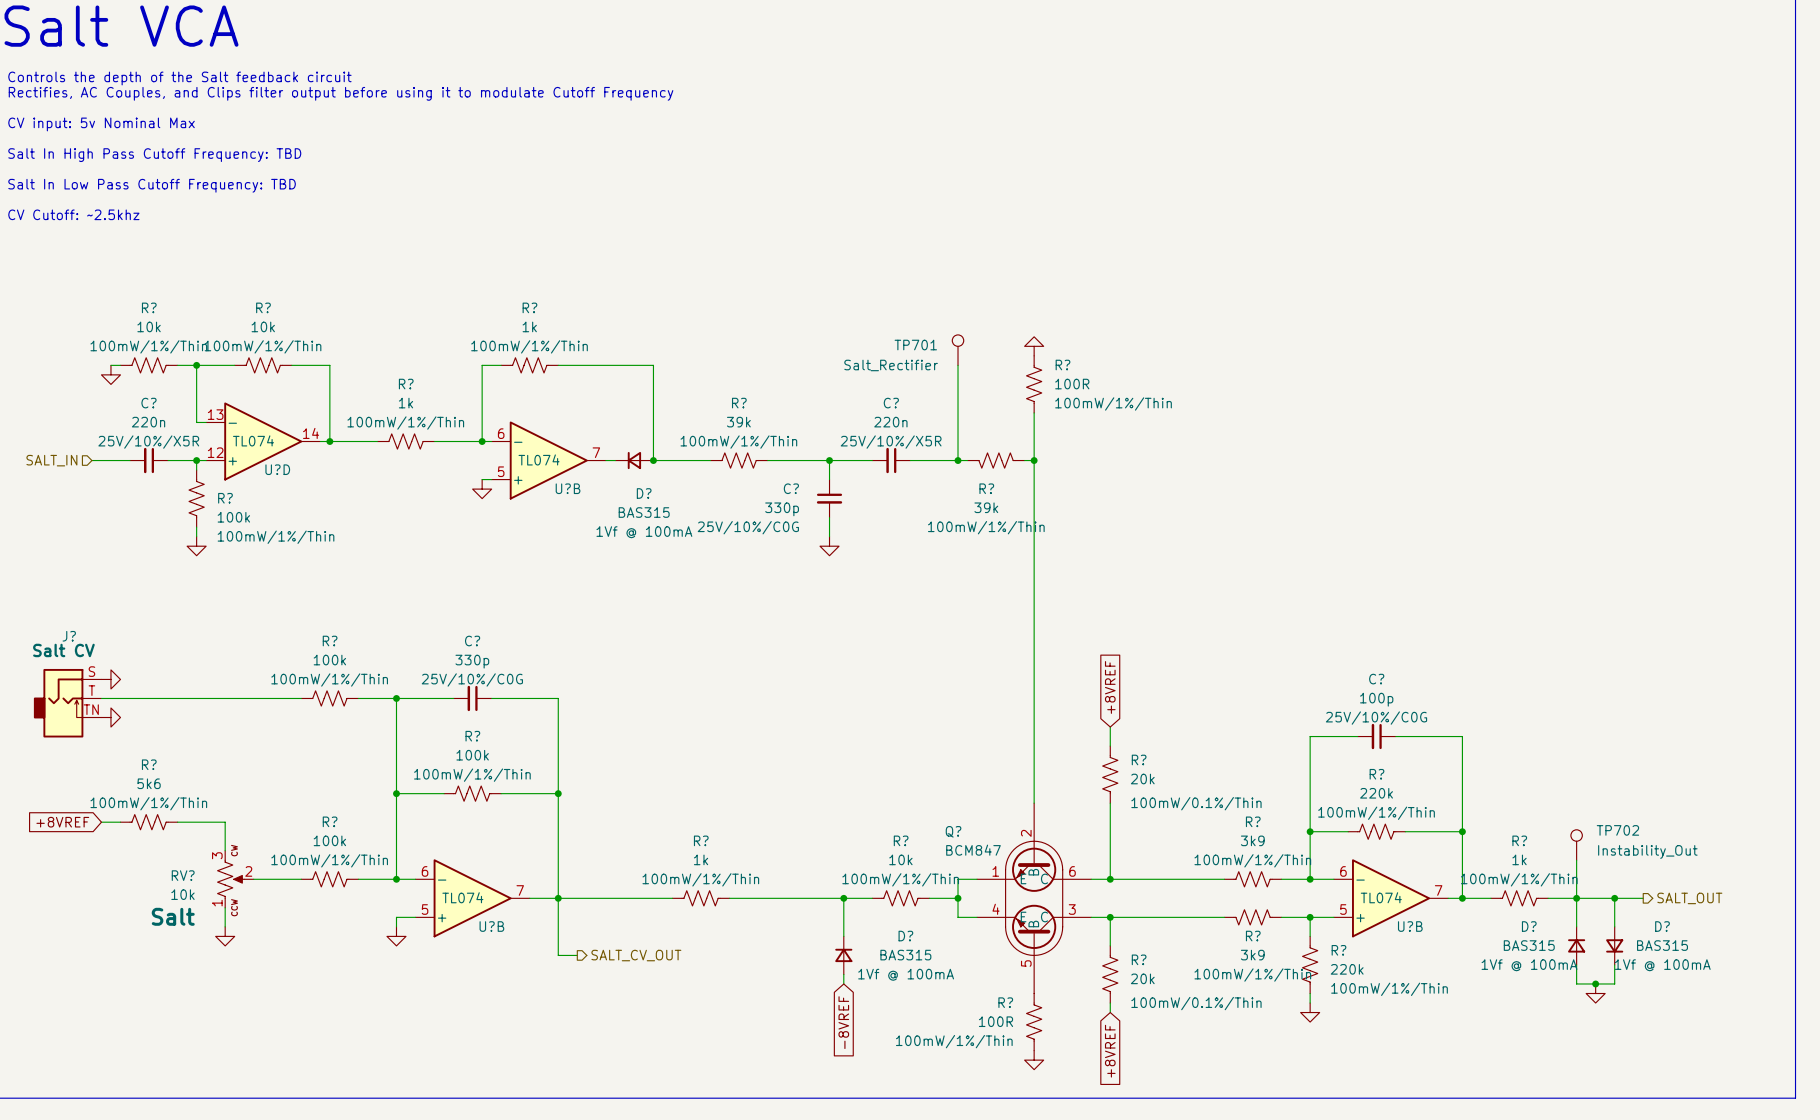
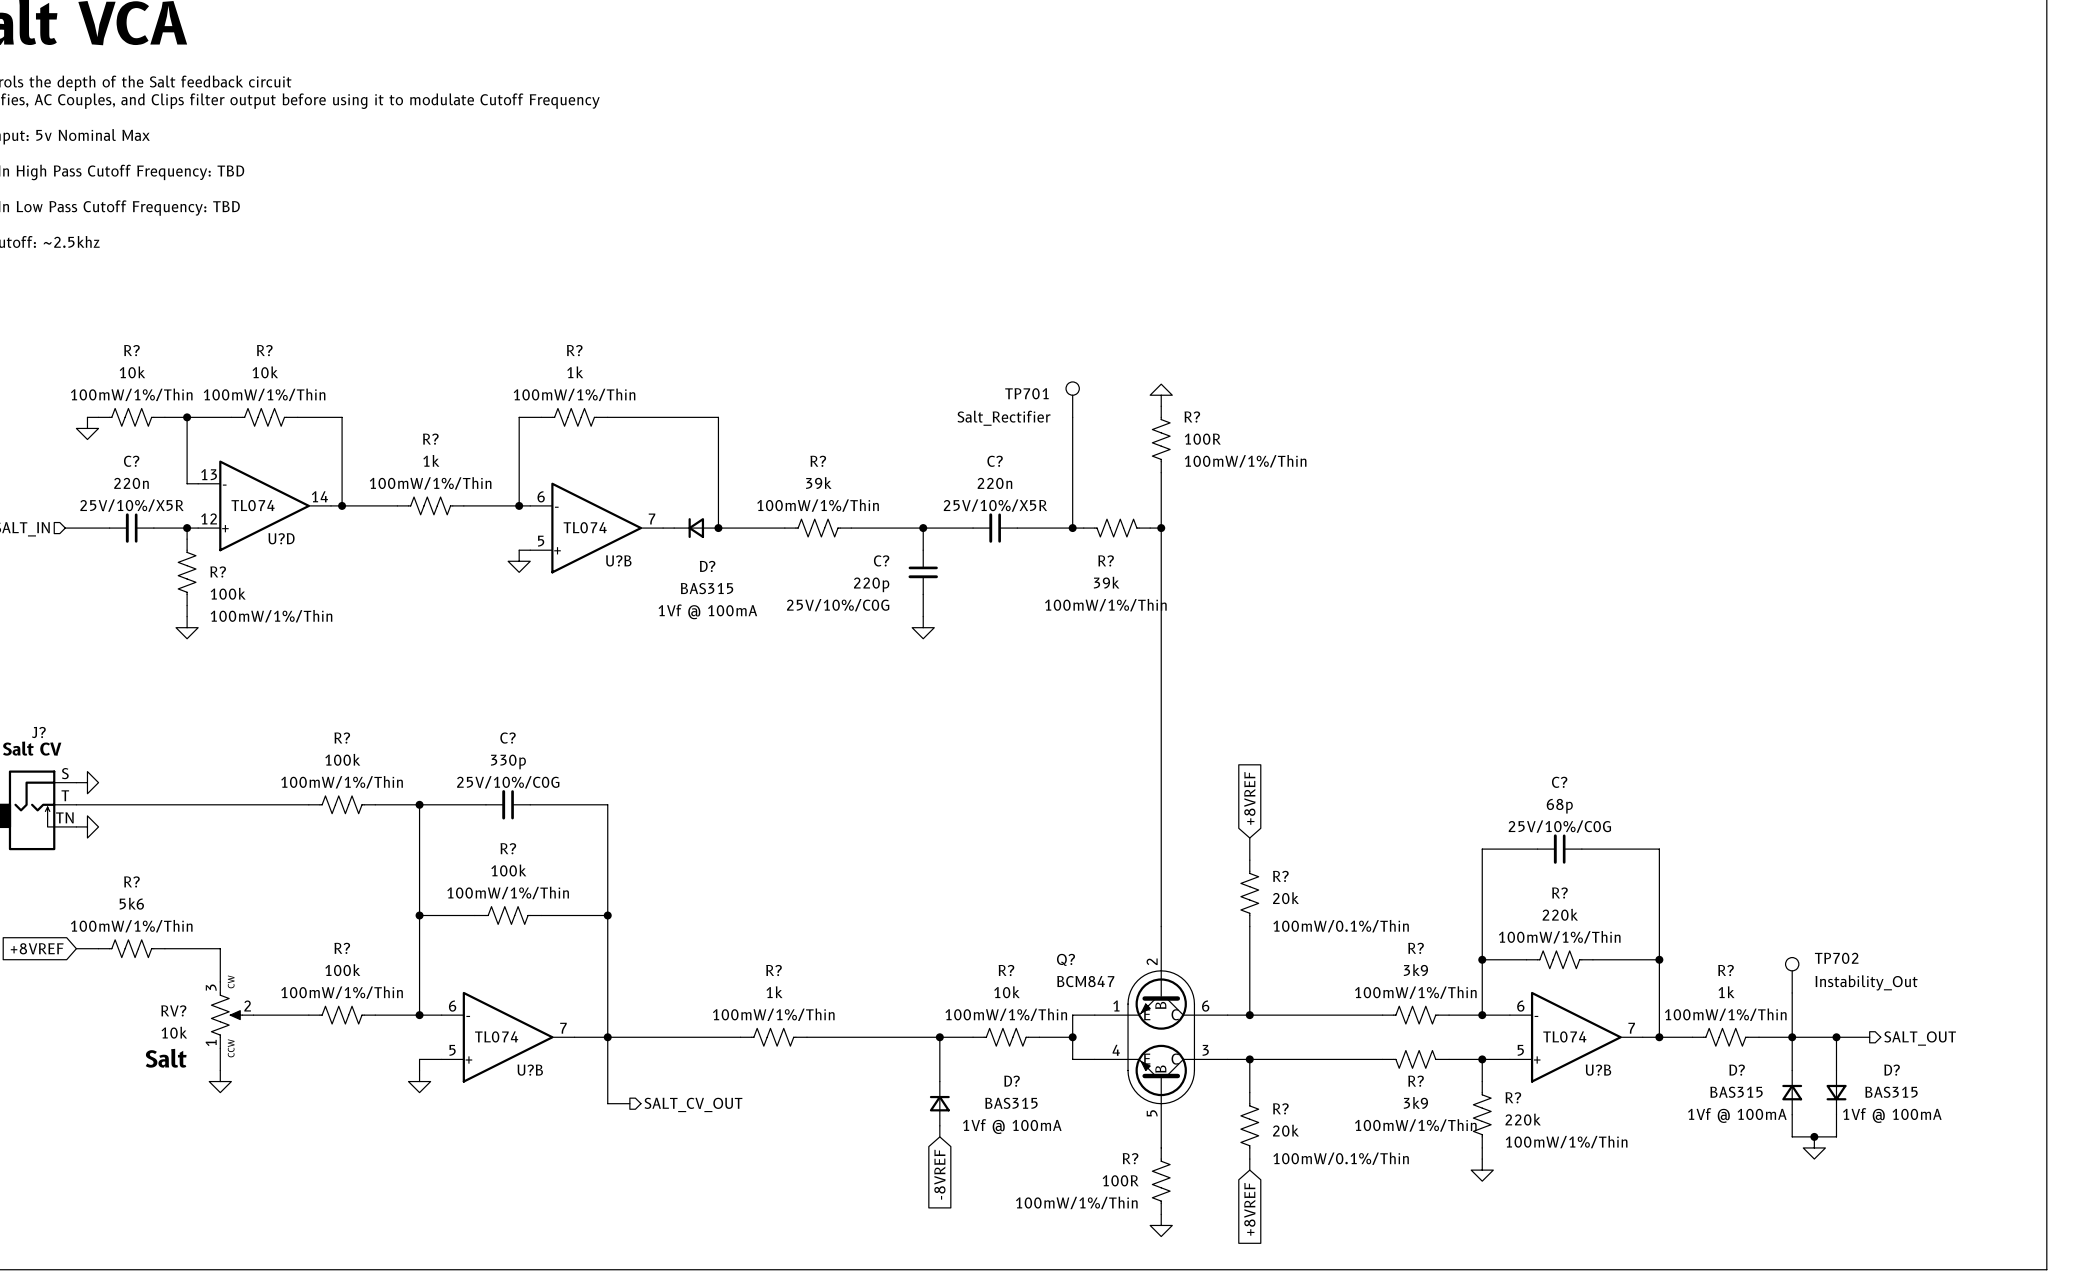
C? value: 330p (782, 509) -> 220p (871, 584)
C? value: 100p (1376, 699) -> 68p (1559, 806)

